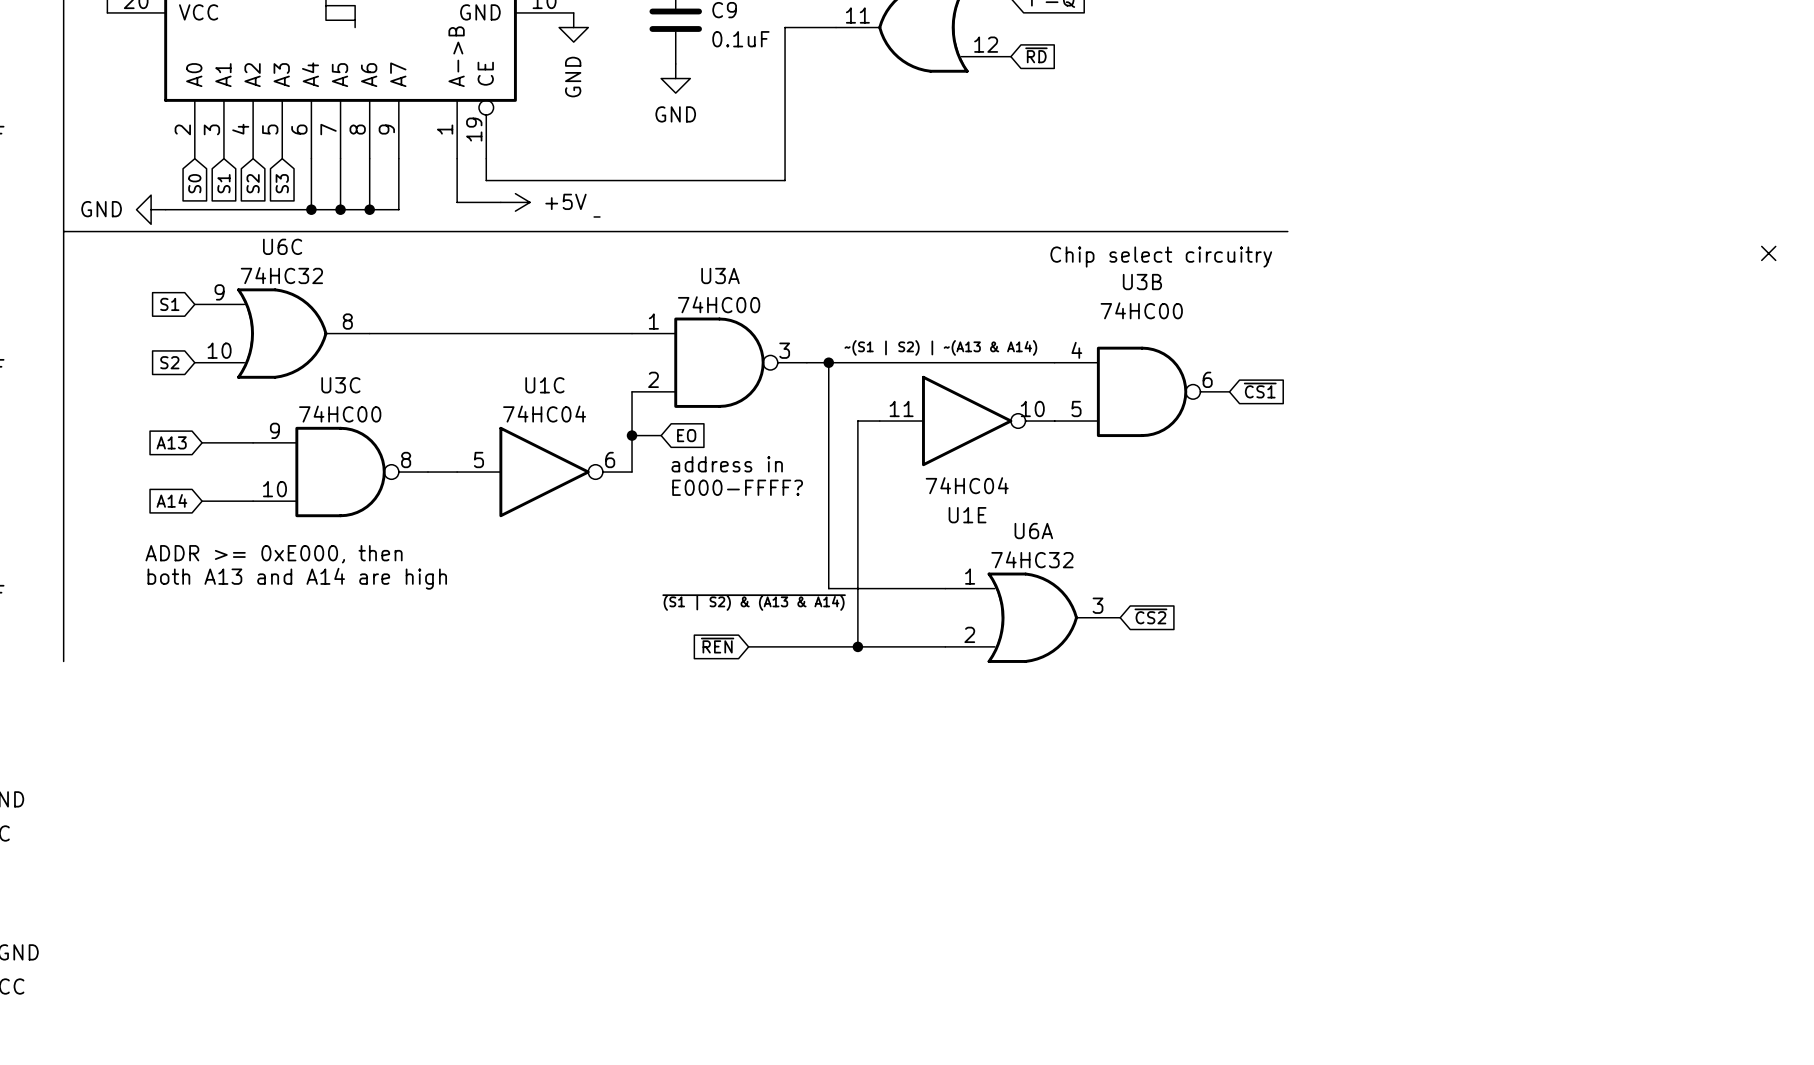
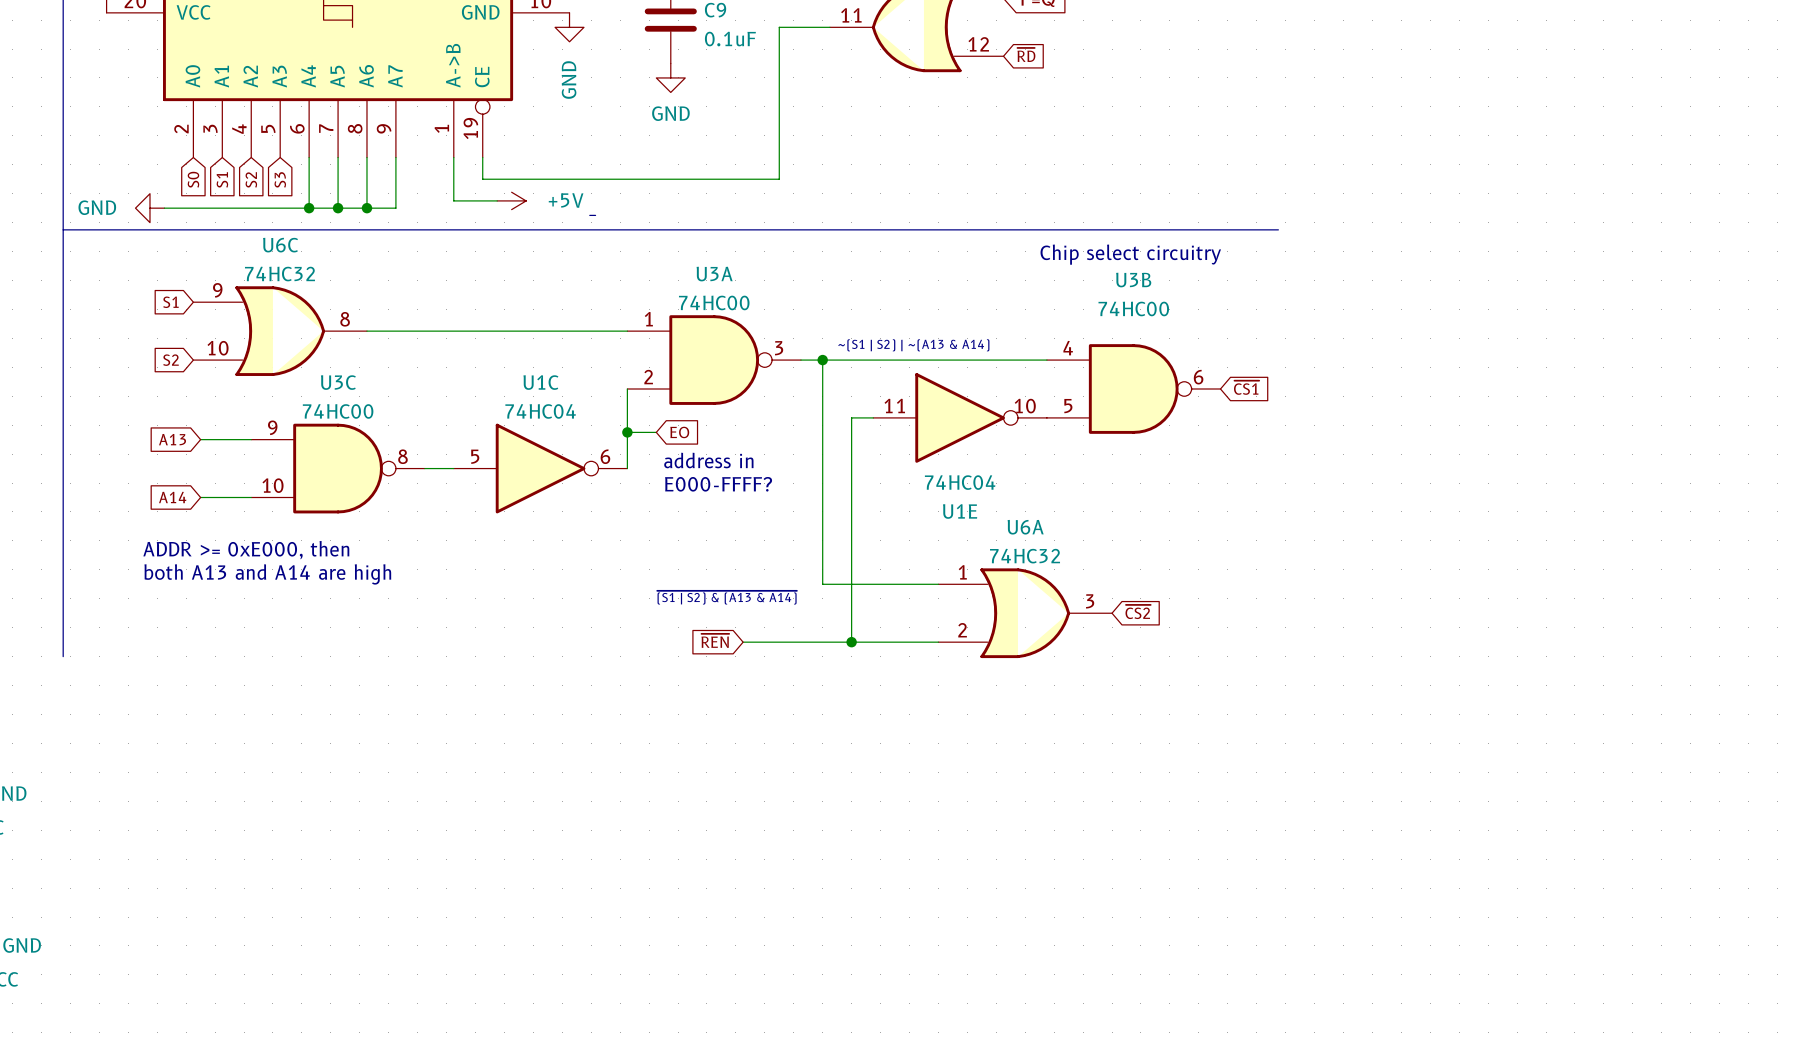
no-connect mark: (1768, 253) -> none

